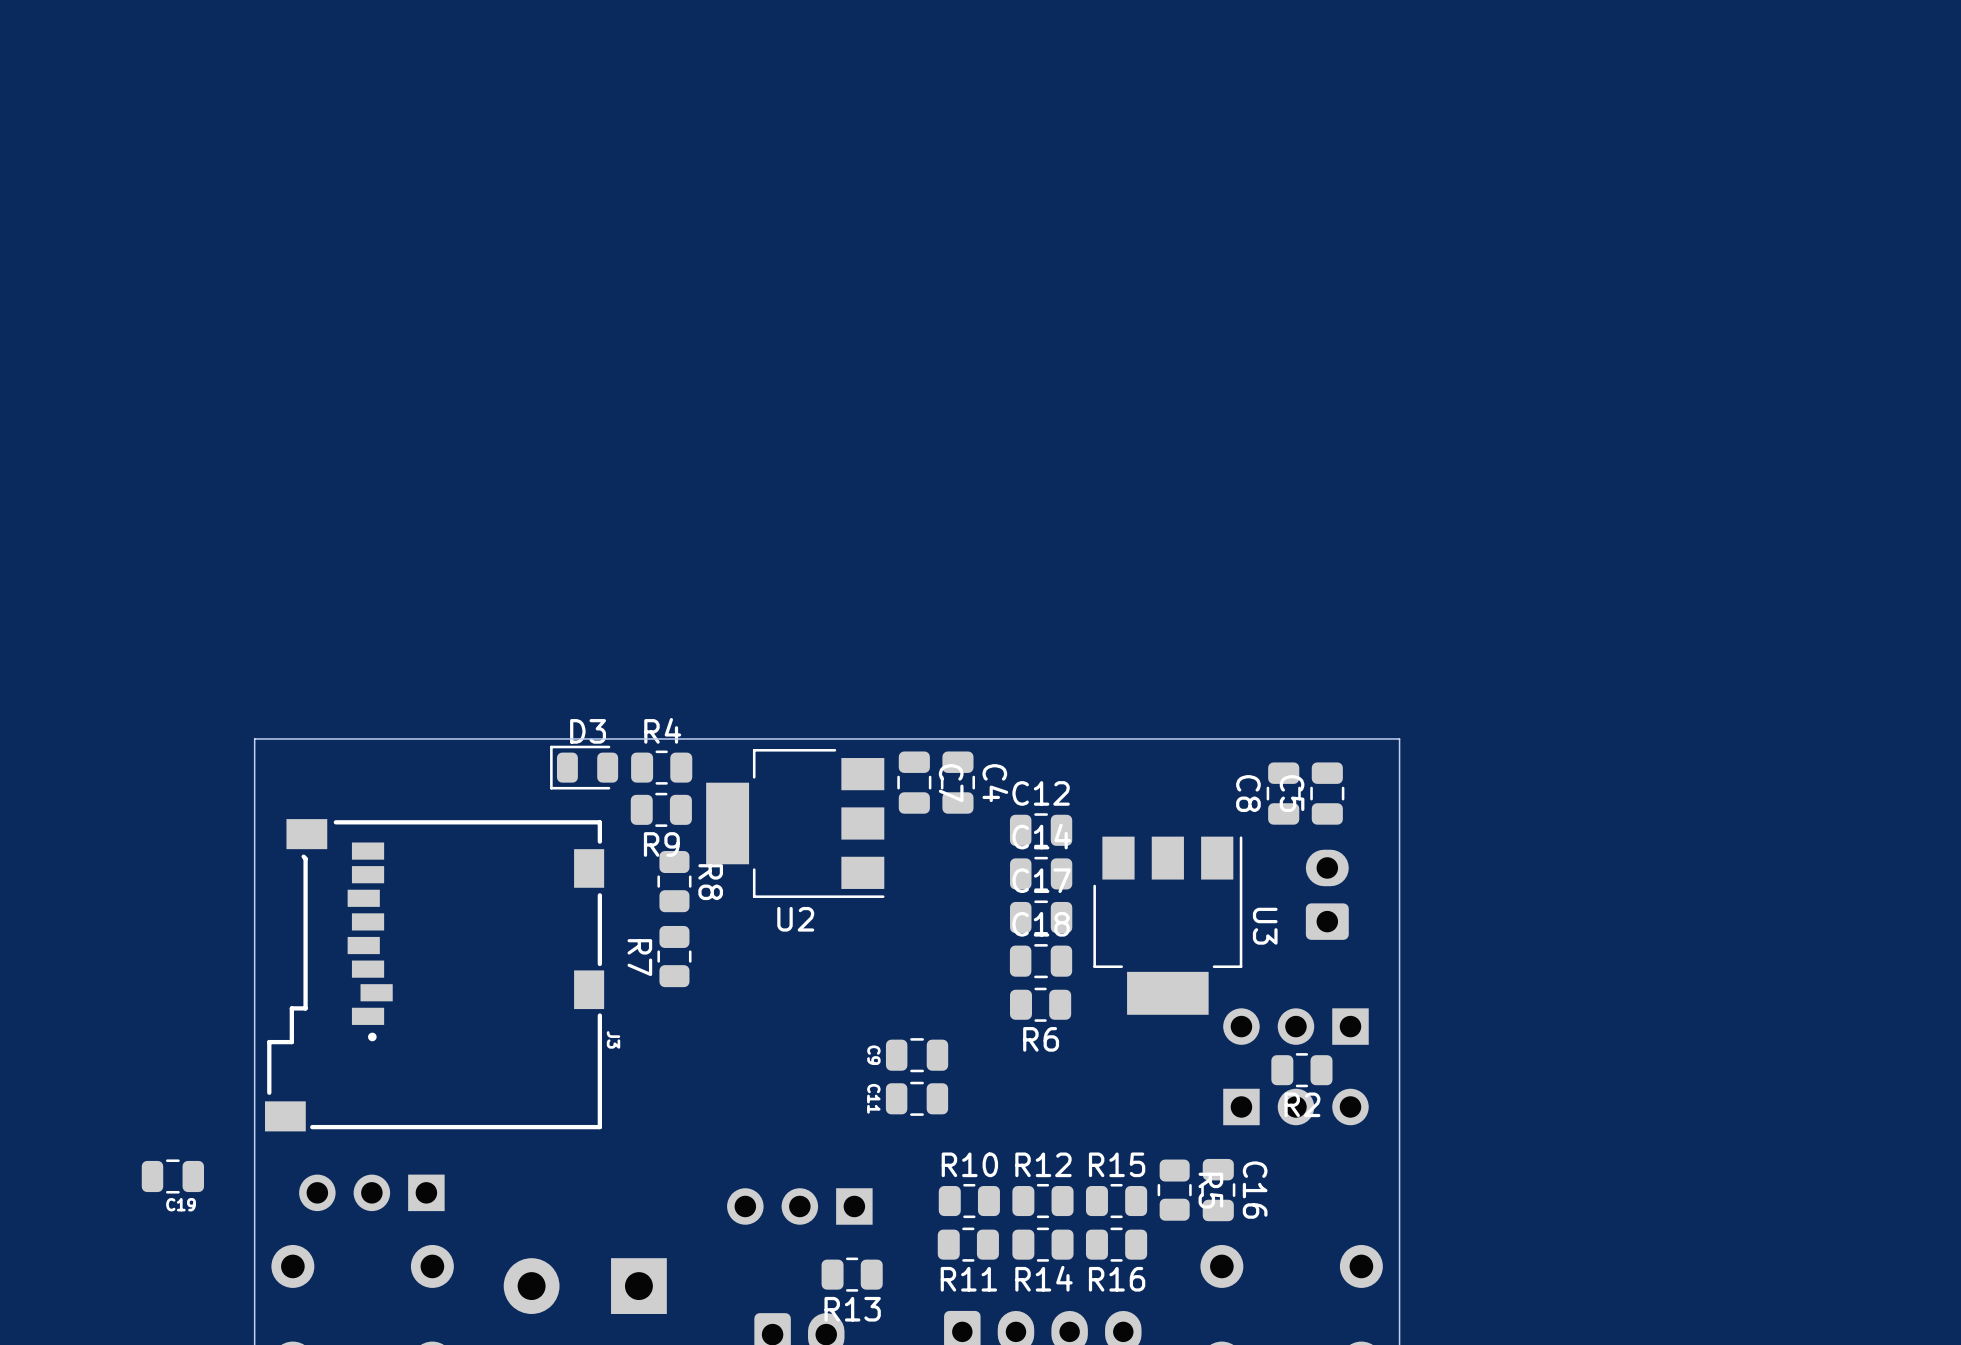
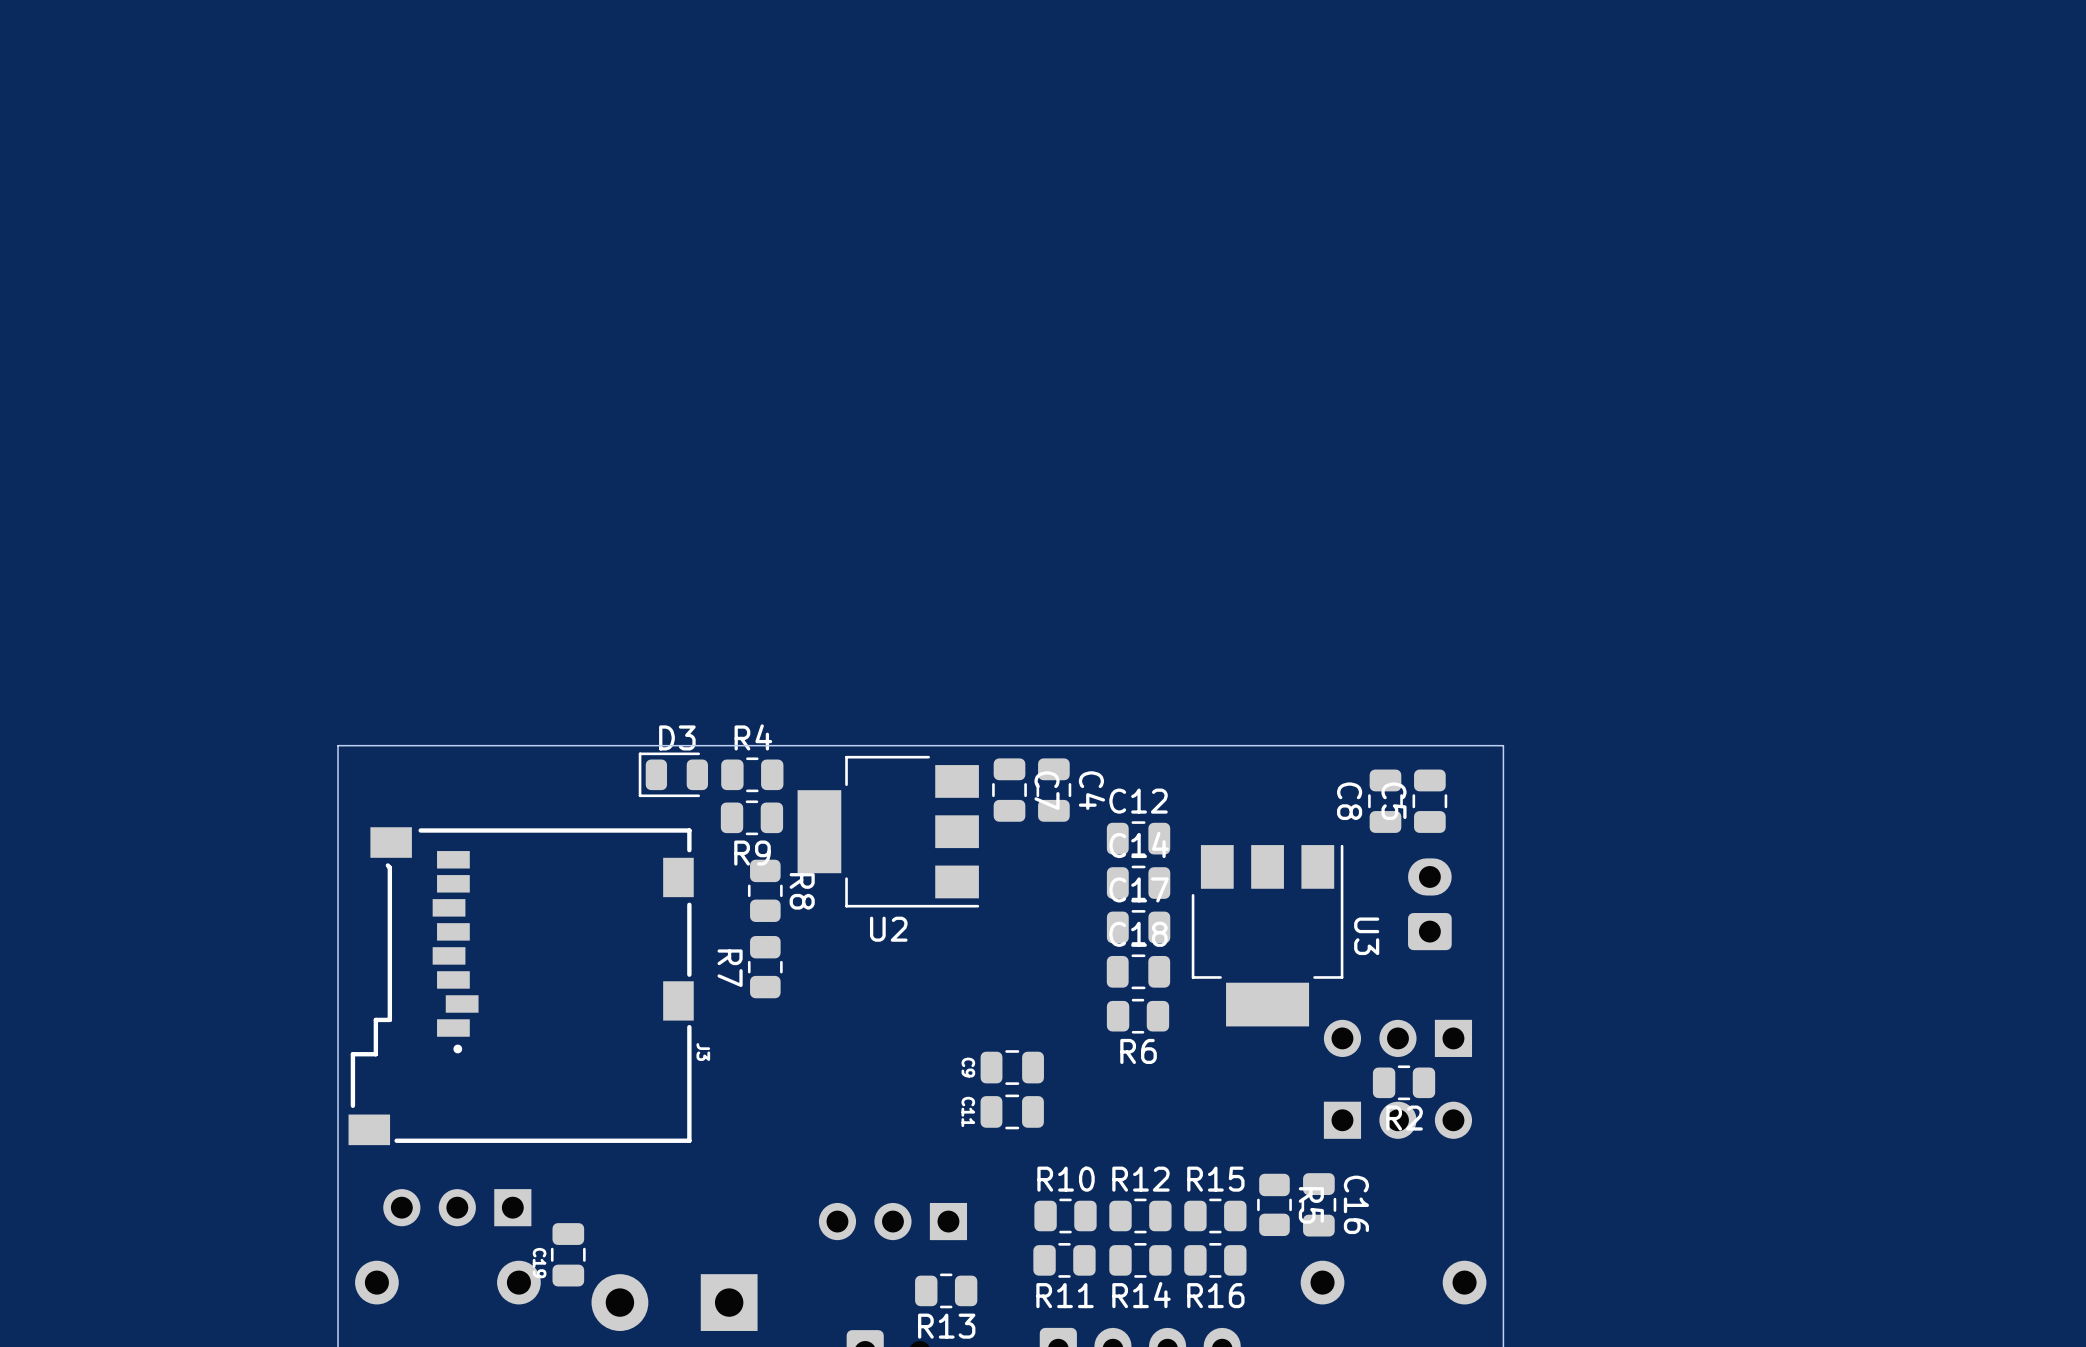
C19 rotation: 0° (172, 1176) -> 90° clockwise (568, 1254)
C19 position: (172, 1176) -> (568, 1254)

